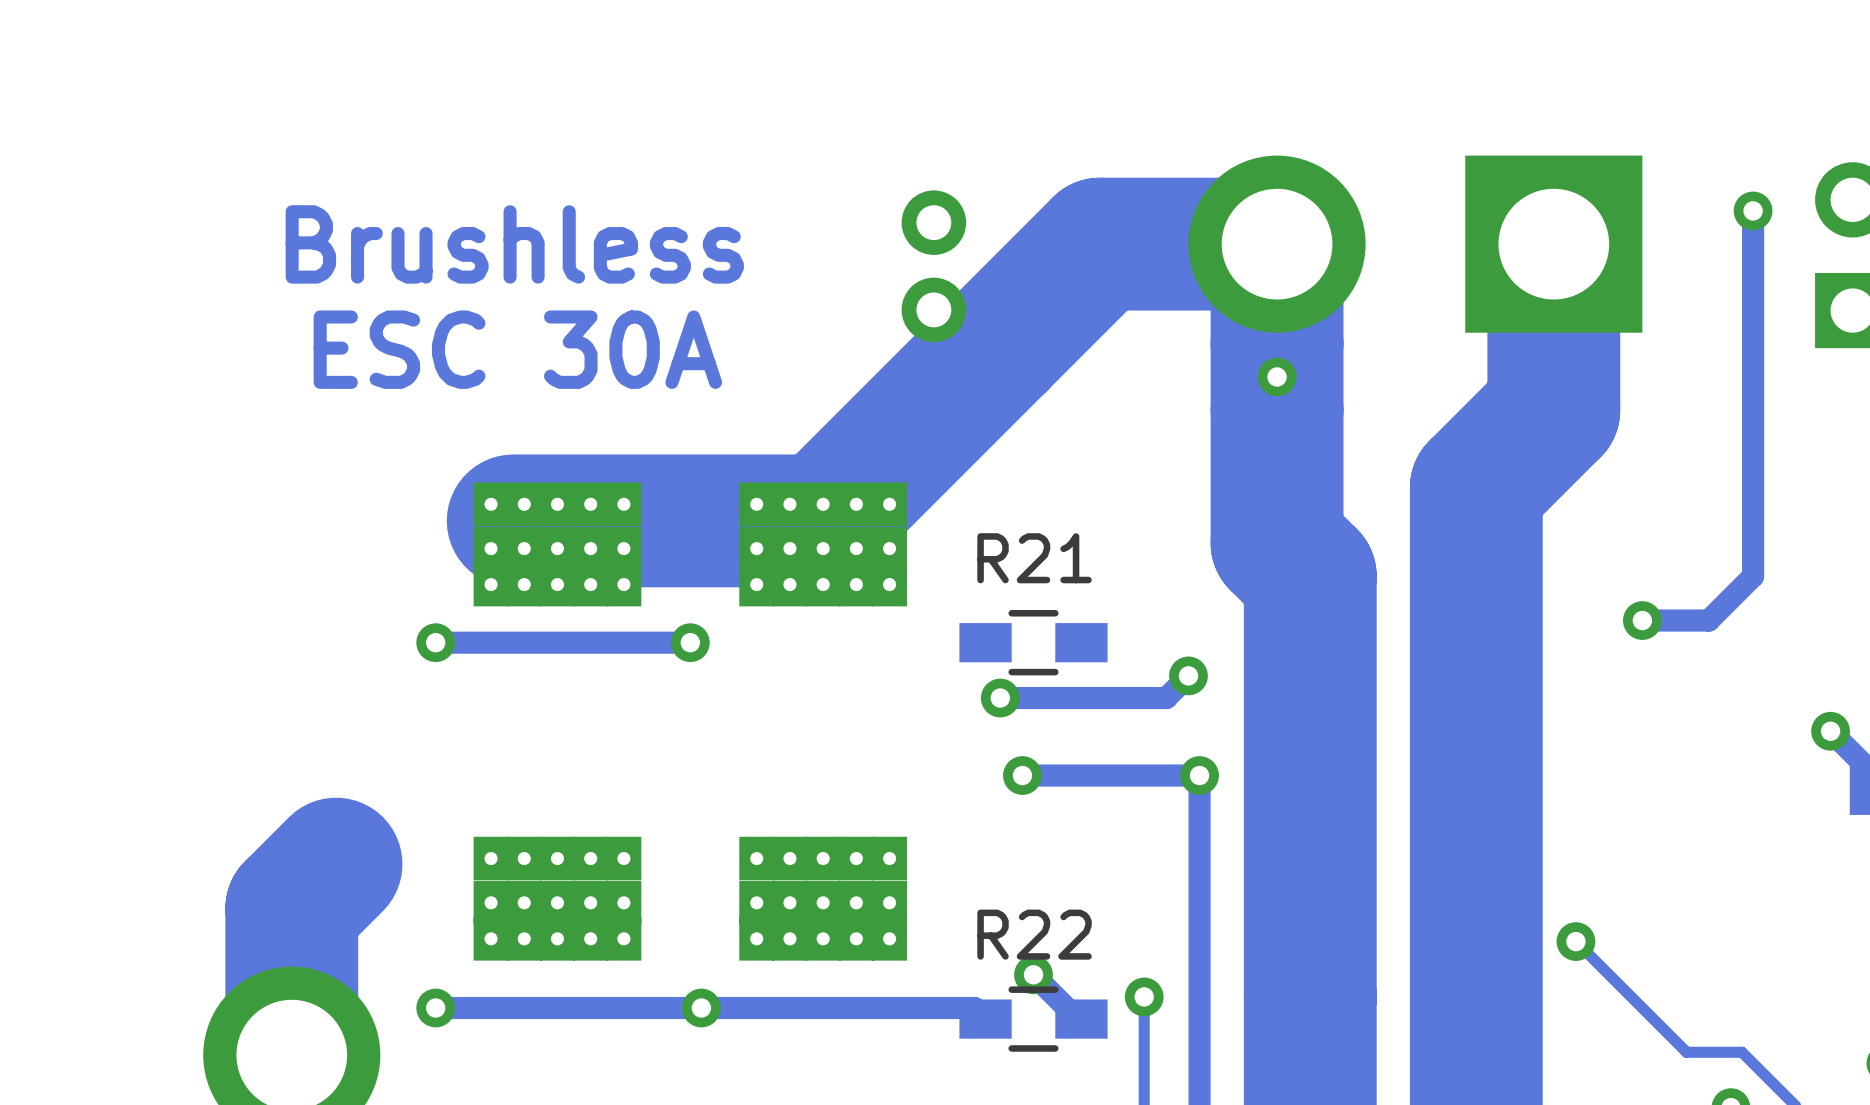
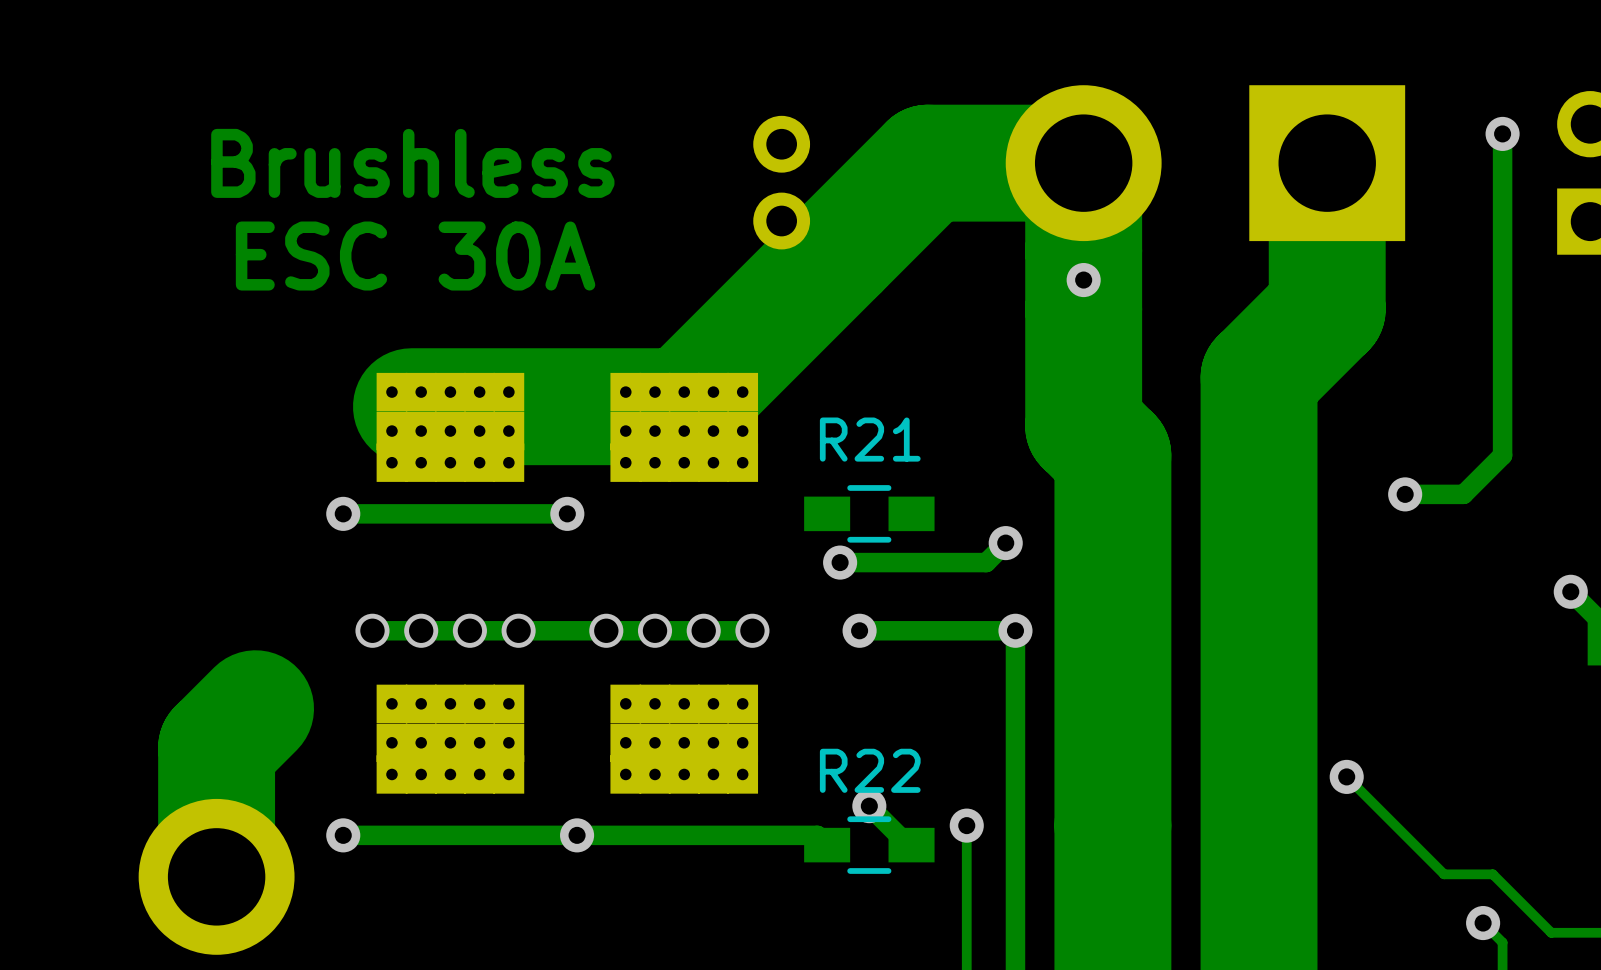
via: none -> (372, 630)
via: none -> (421, 630)
via: none -> (469, 630)
via: none -> (518, 630)
via: none -> (606, 630)
via: none -> (655, 630)
via: none -> (703, 630)
track: none -> (752, 630) (372, 630)
via: none -> (752, 630)

